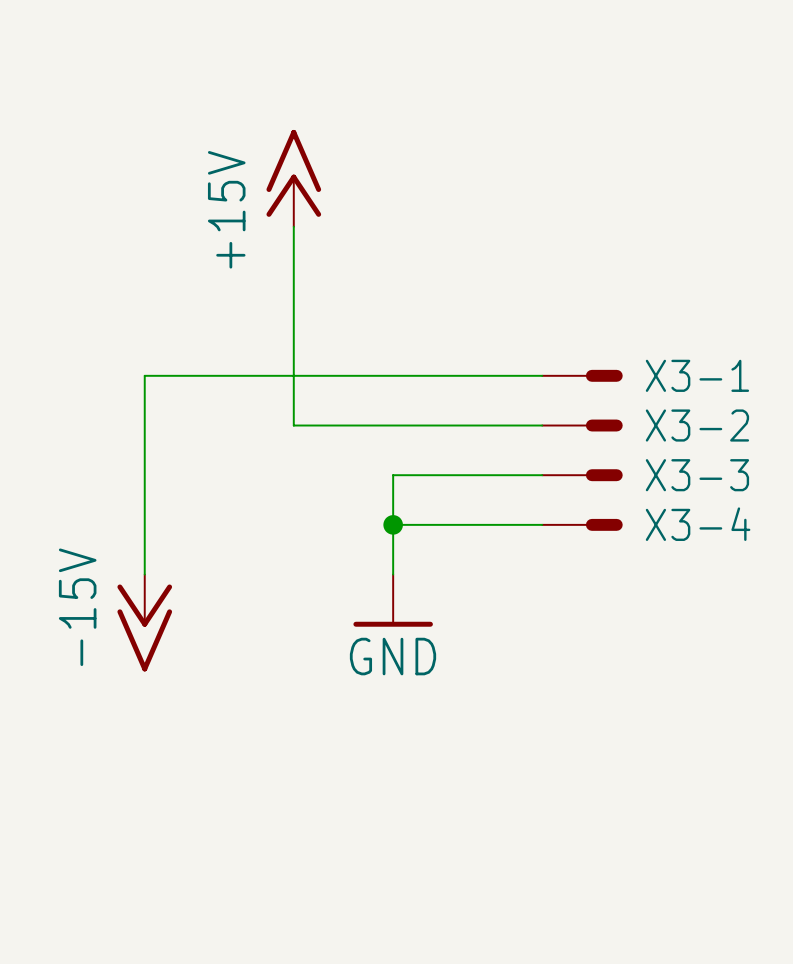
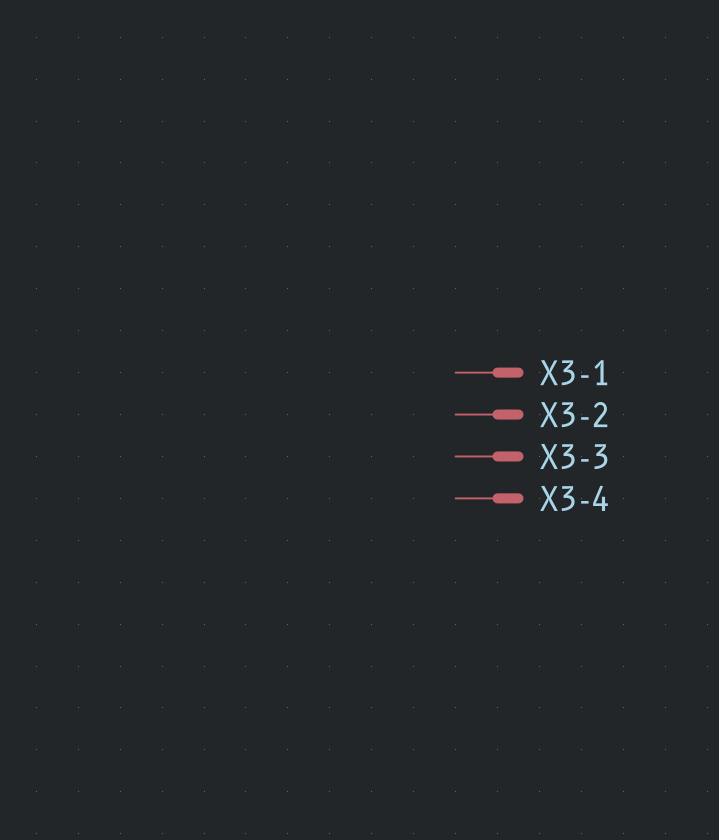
power symbol: +15V (293, 178) -> none
wire: (293, 226) (293, 425) (542, 425) -> none
wire: (542, 375) (144, 375) (144, 574) -> none
wire: (542, 475) (393, 475) (393, 574) -> none
wire: (393, 524) (542, 524) -> none
junction: (393, 524) -> none
power symbol: GND (393, 600) -> none
power symbol: -15V (144, 623) -> none

